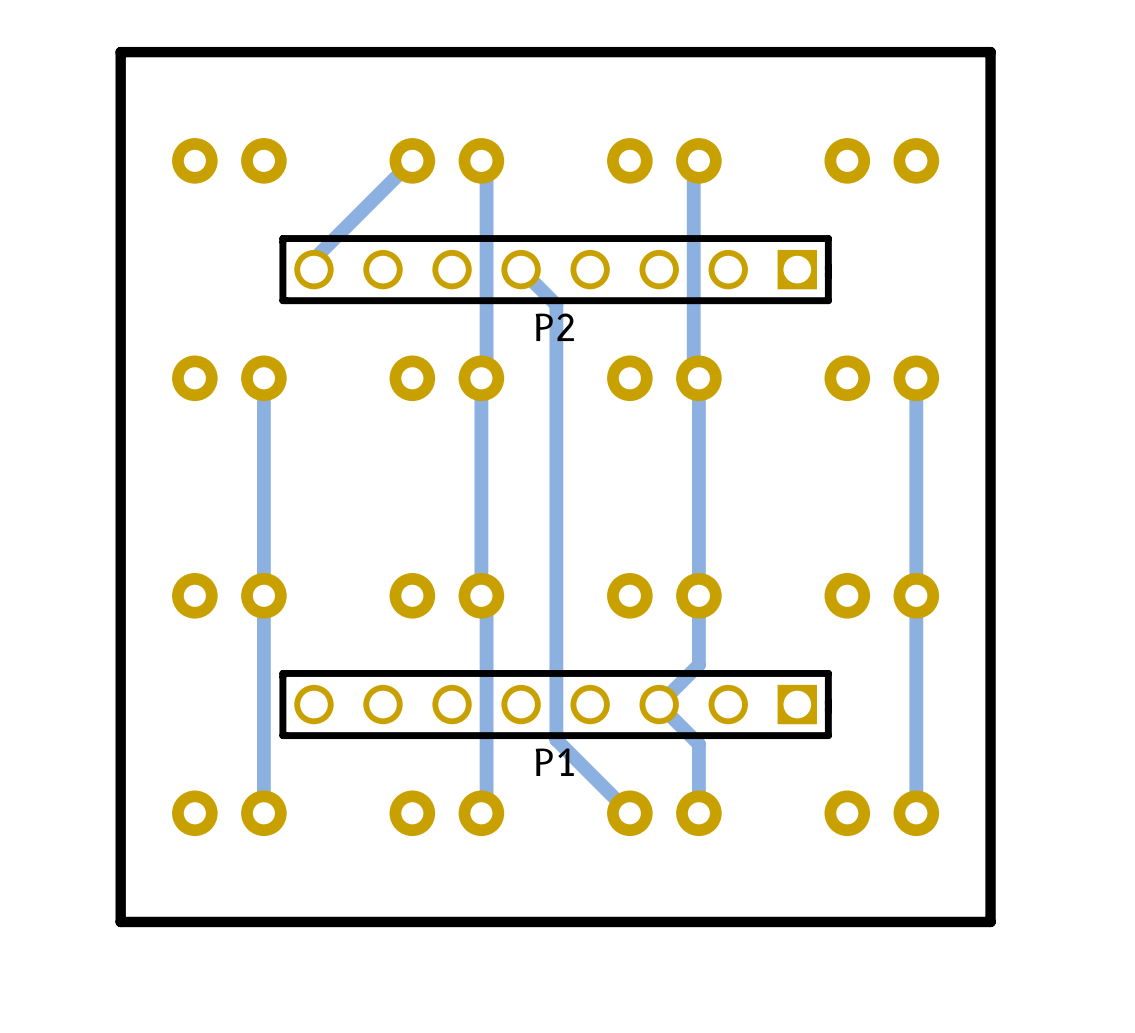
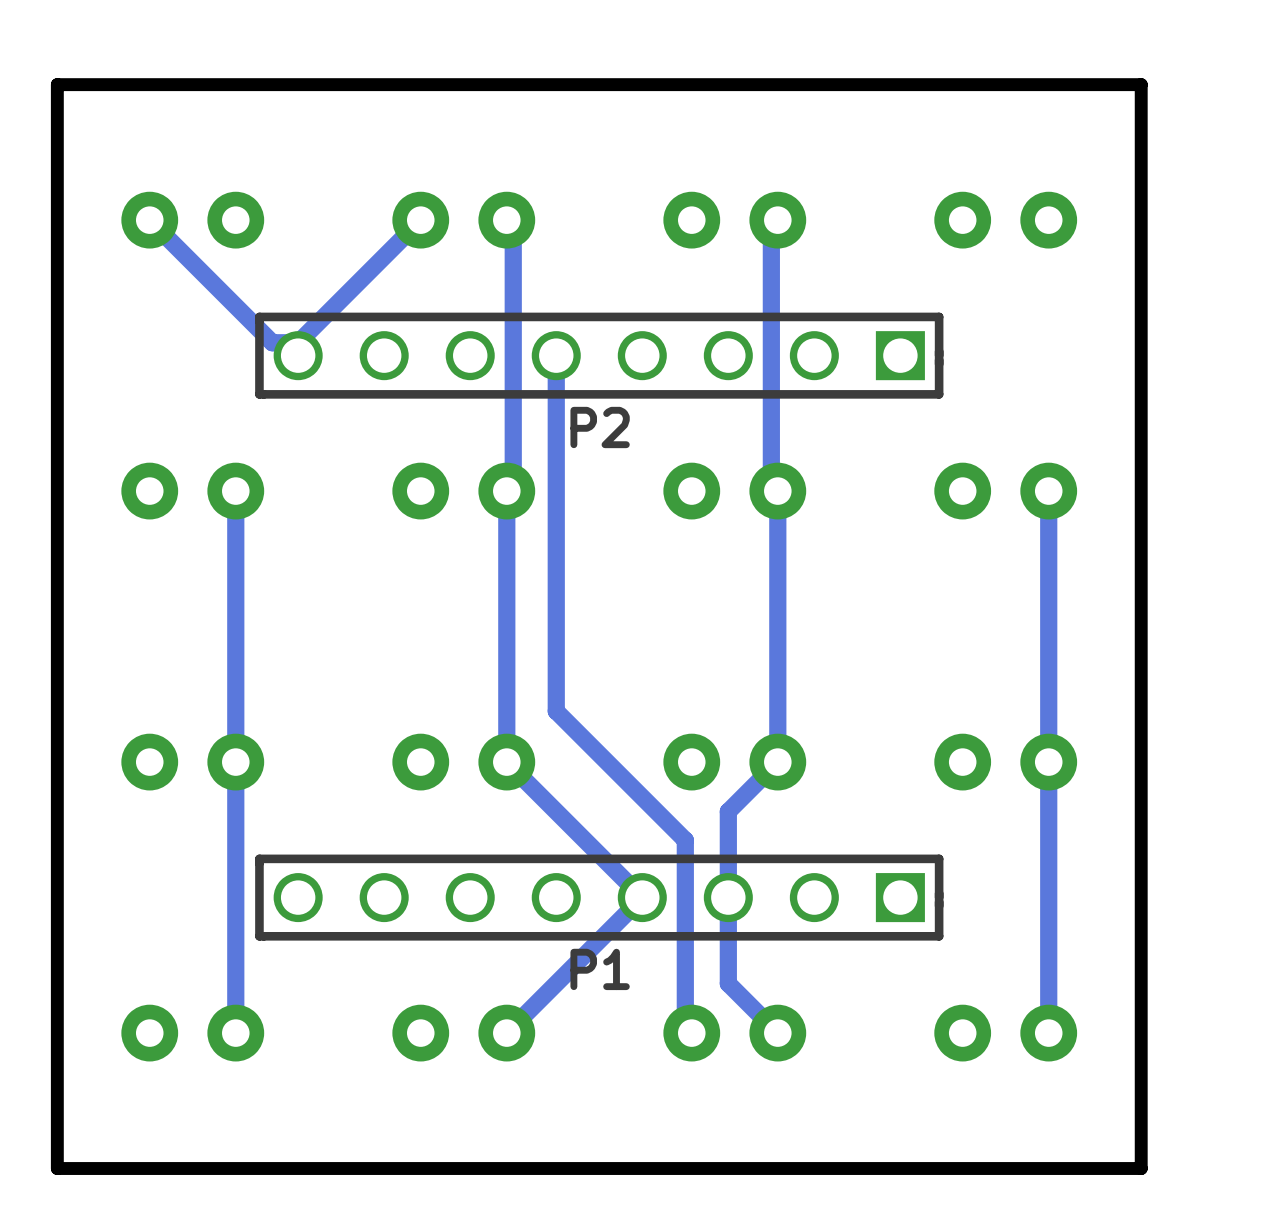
track: none -> (149, 220) (272, 342) (298, 342)
track: (521, 269) (556, 304) (556, 739) (624, 808) -> (556, 355) (556, 711) (685, 840) (685, 1026)
track: (698, 595) (698, 664) (659, 704) (698, 744) (698, 813) -> (777, 762) (728, 811) (728, 983) (777, 1033)
track: (486, 600) (486, 808) -> (513, 768) (642, 897) (513, 1026)

